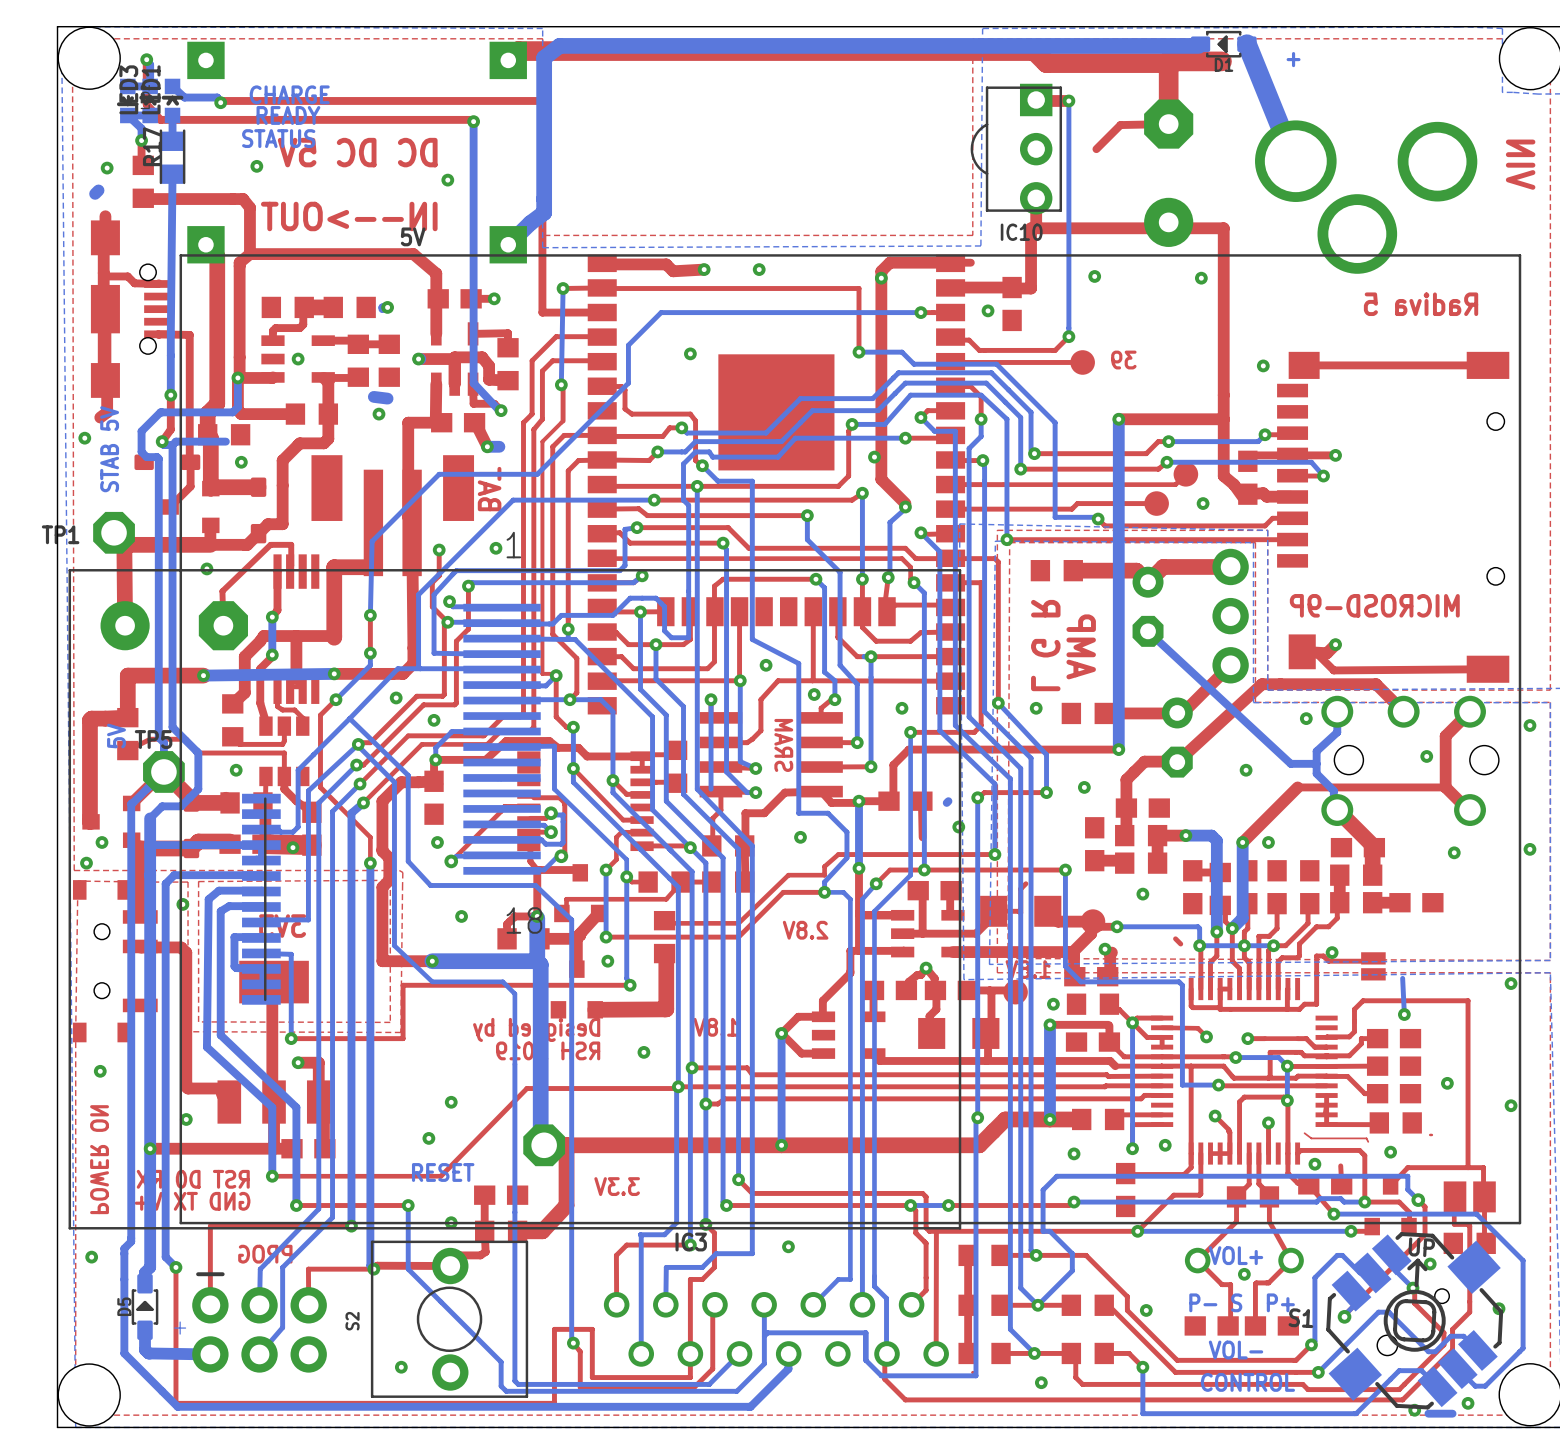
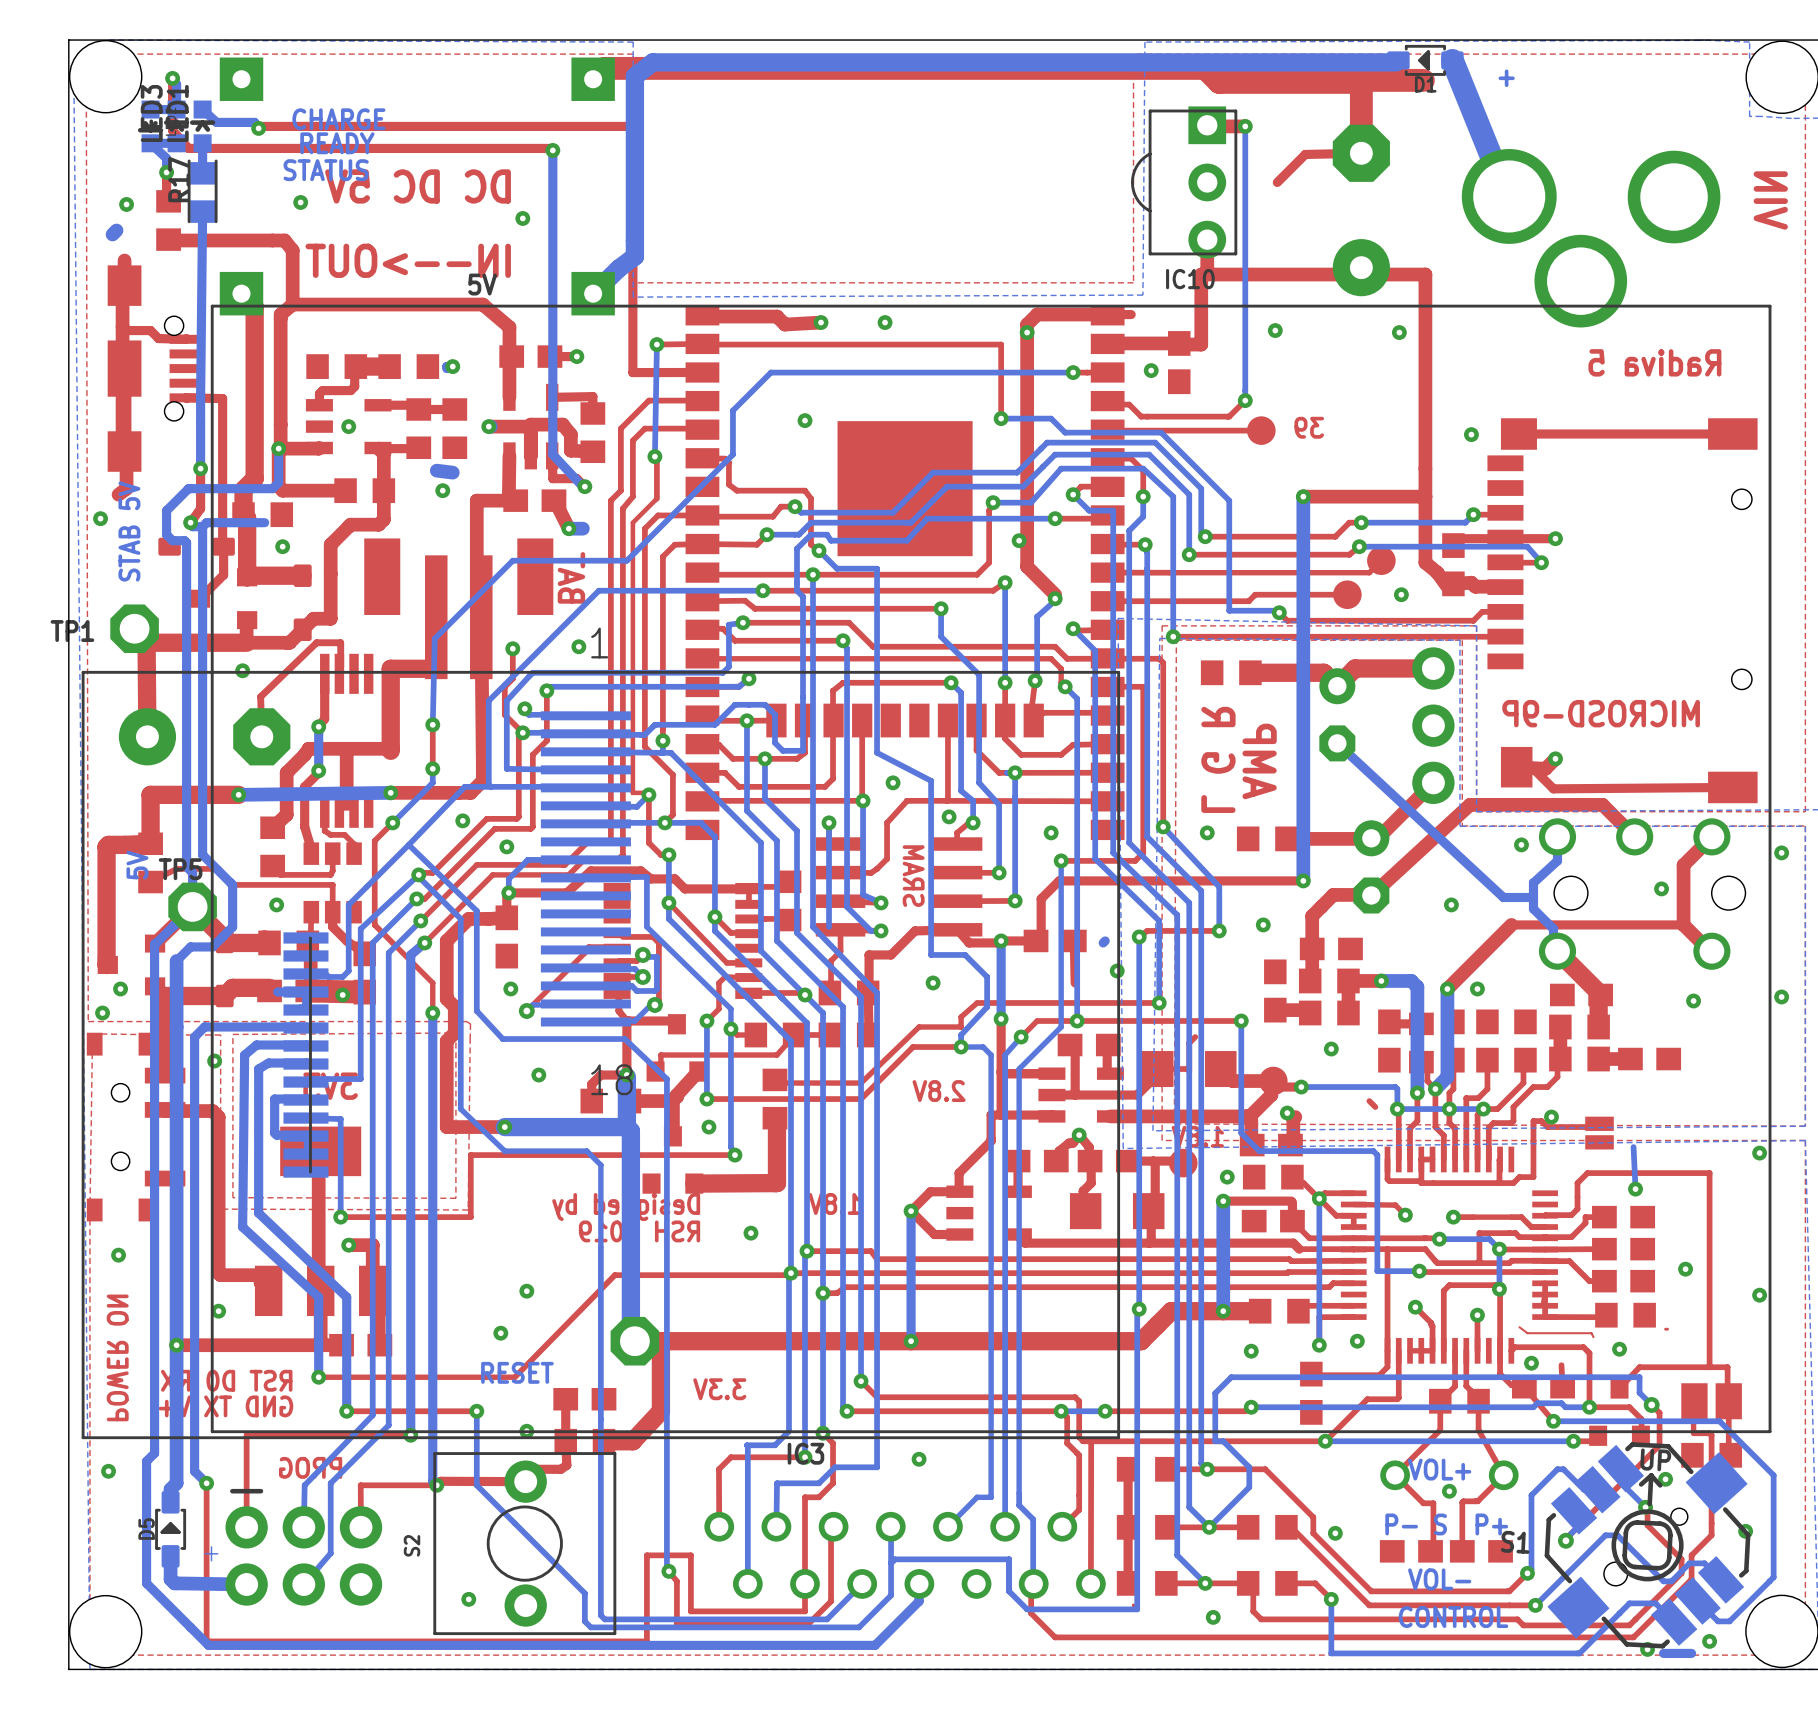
bottom track: (237, 845) (150, 845) -> none

